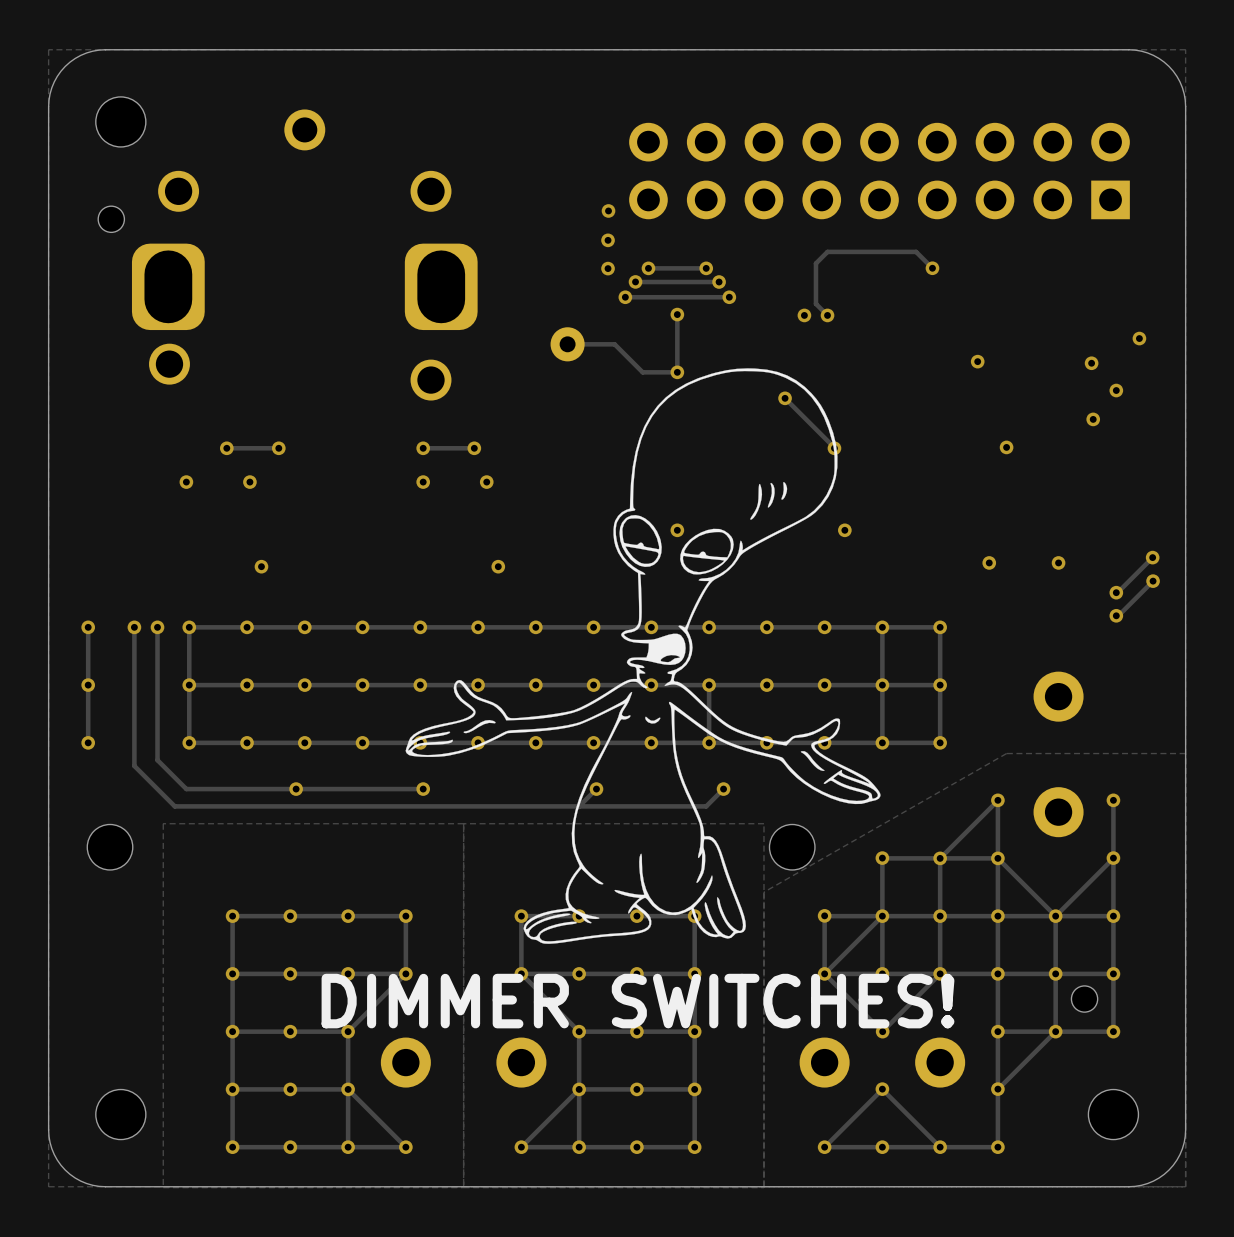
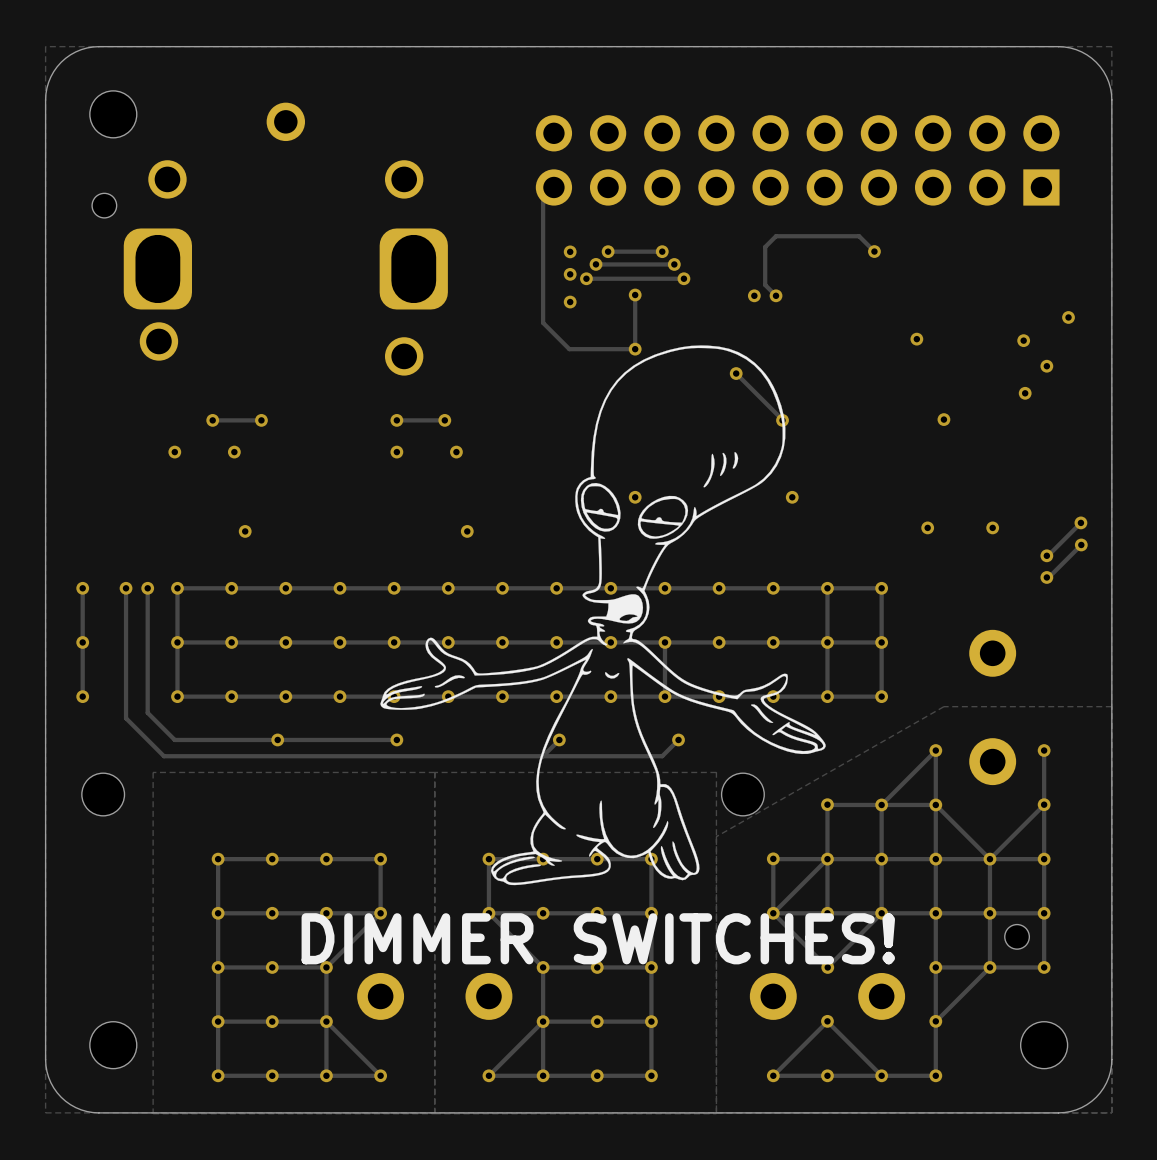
part: none -> (797, 160)
via: (608, 210) -> none
via: (608, 240) -> none
via: none -> (570, 274)
via: none -> (570, 302)
track: (567, 344) (614, 344) (642, 372) -> (553, 187) (543, 198) (543, 322) (569, 349) (602, 349)
part: (567, 344) -> none

